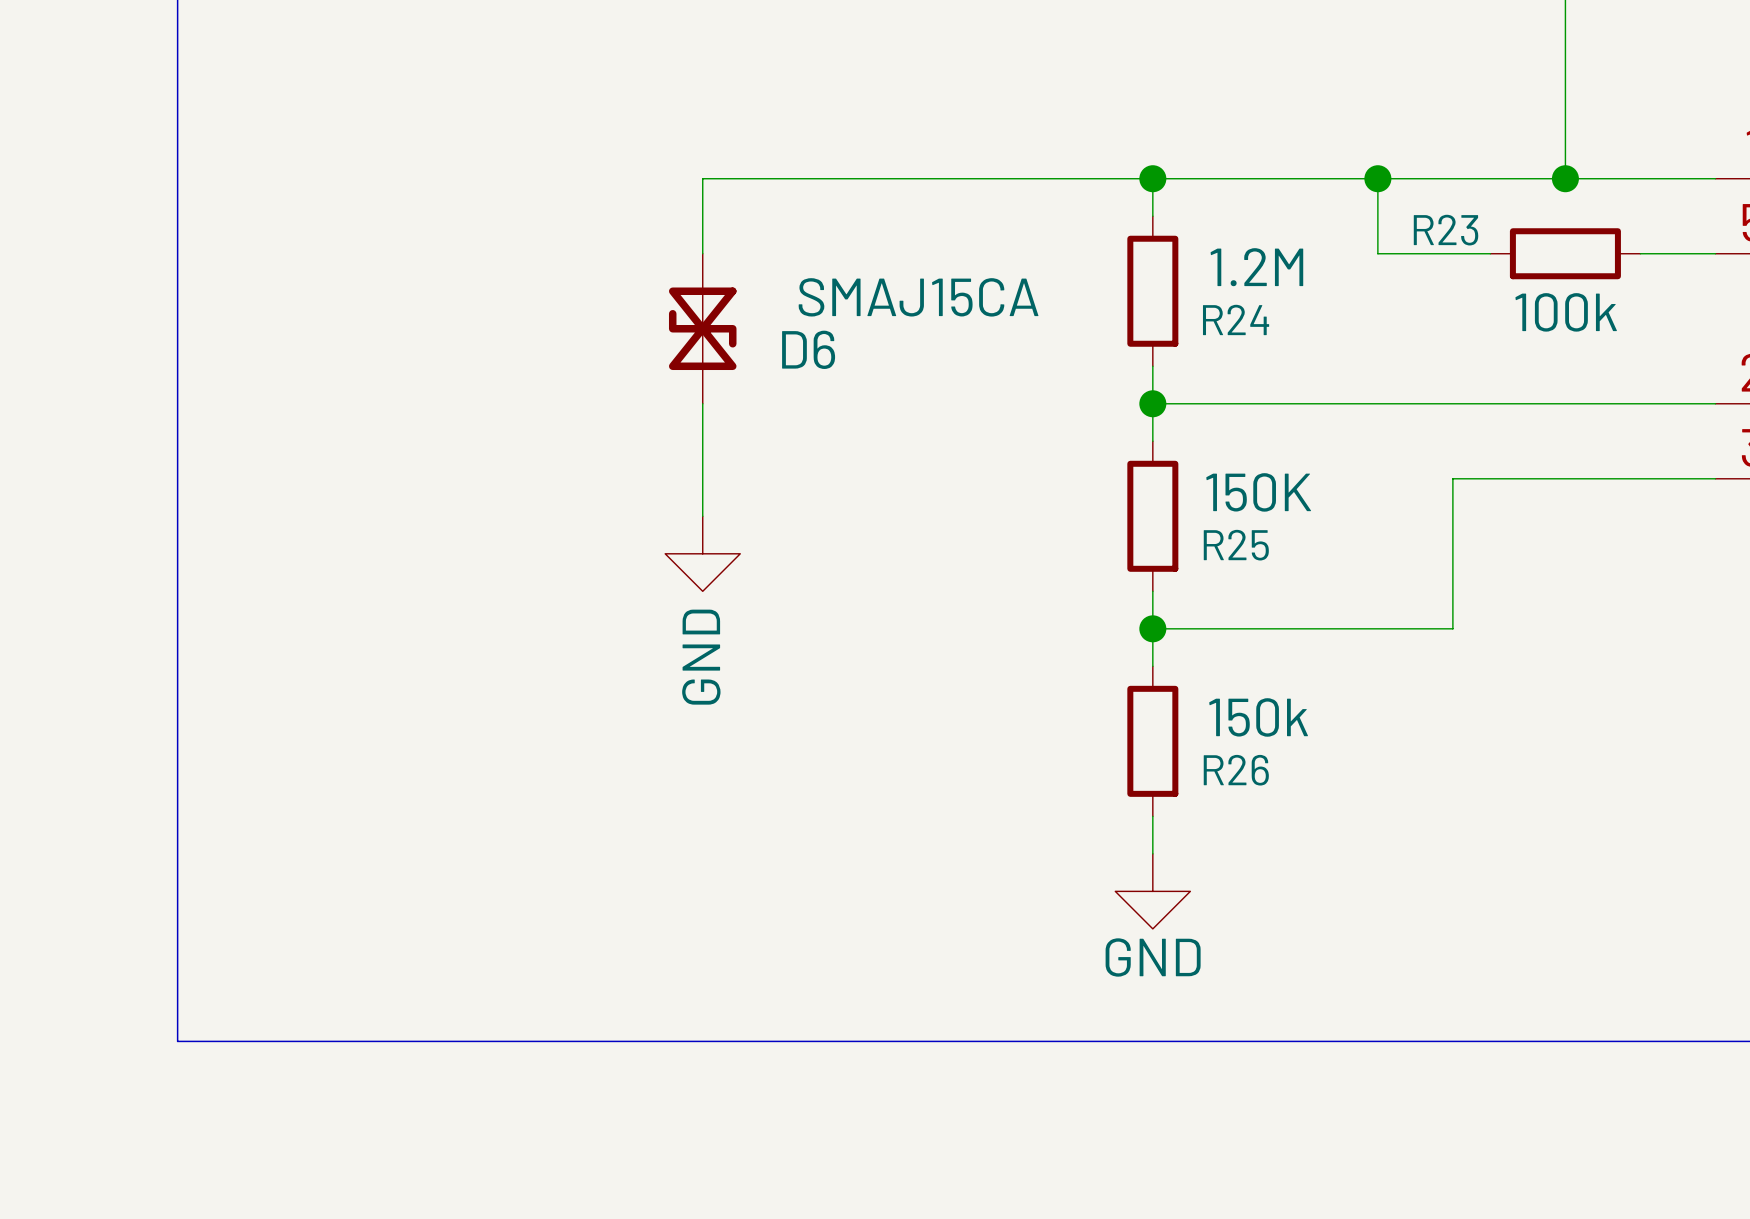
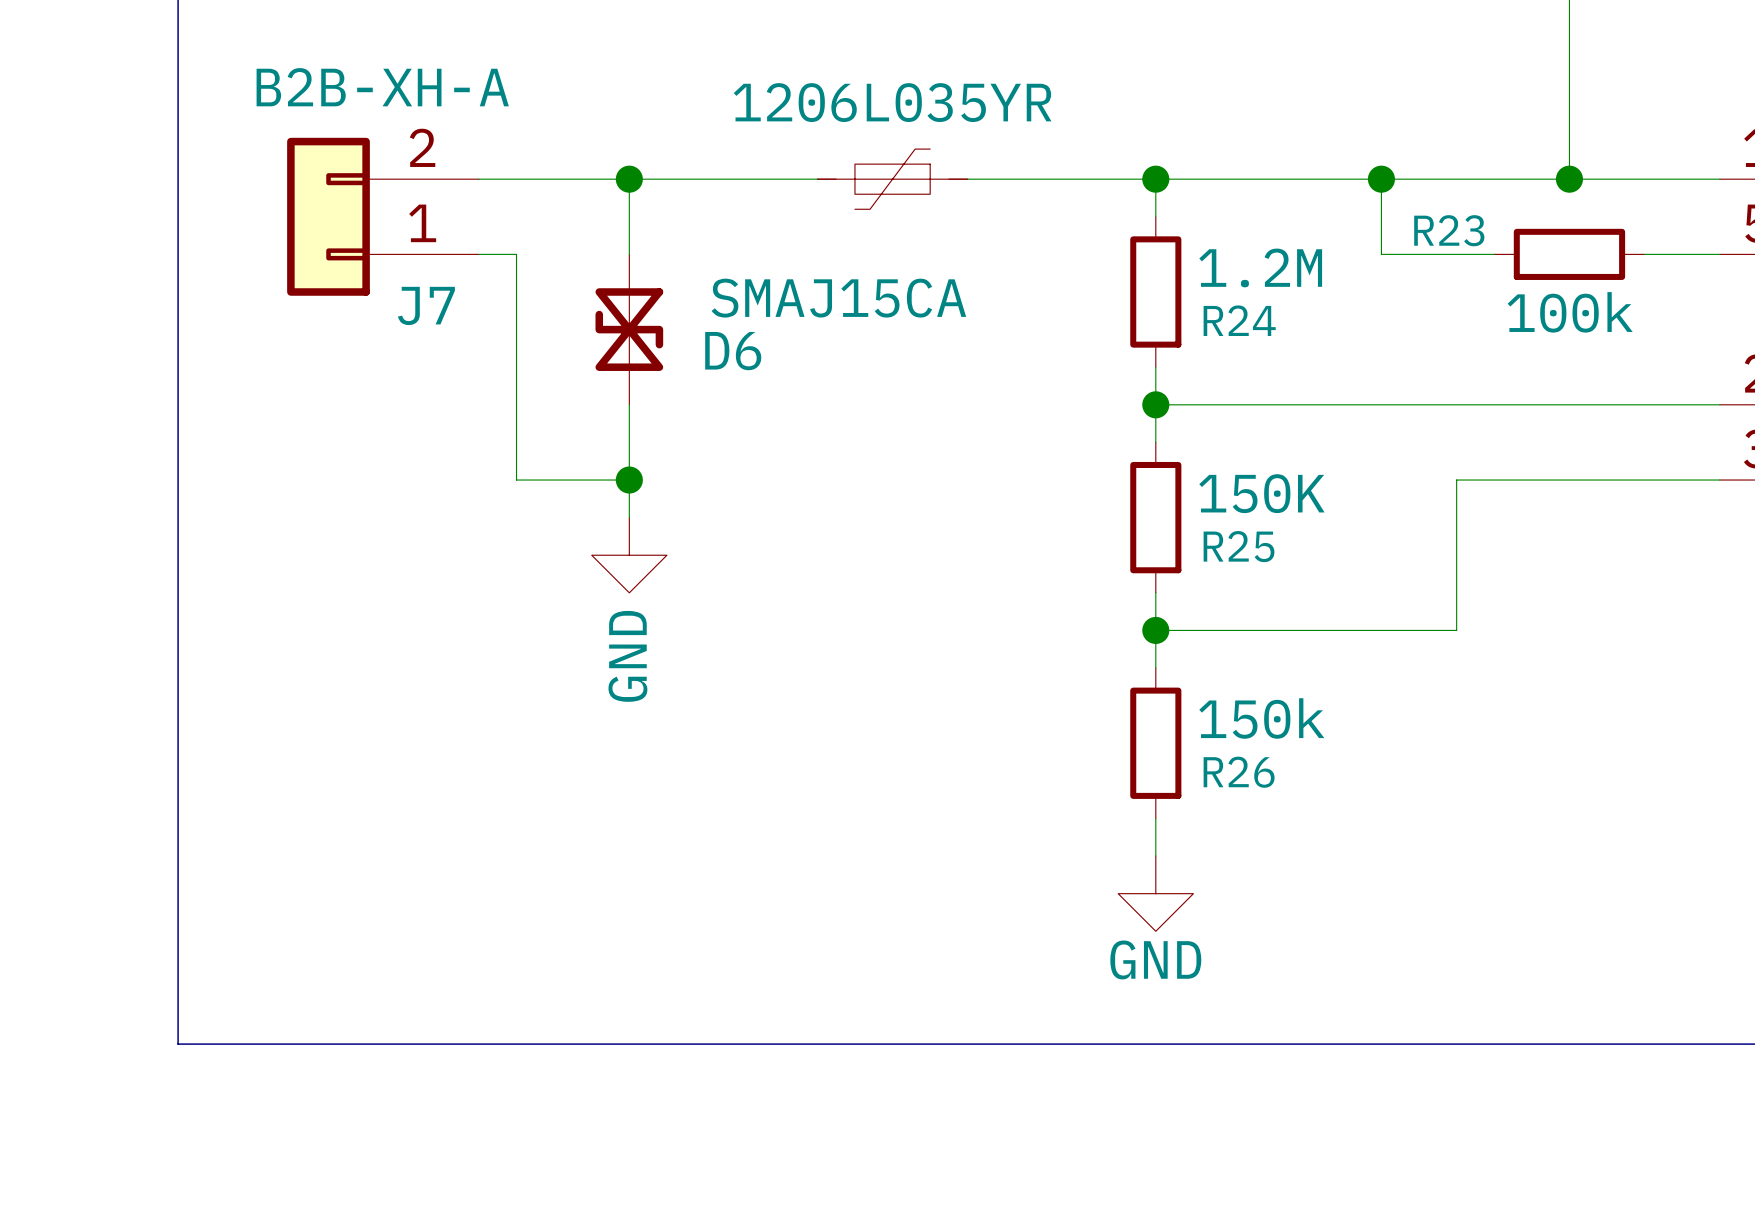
wire: none -> (629, 179) (629, 254)
junction: none -> (629, 179)
wire: (702, 178) (702, 253) -> (704, 179) (478, 179)
part: none -> 1206L035YR (892, 179)
J7: none -> B2B-XH-A (383, 216)
wire: none -> (478, 254) (516, 254) (516, 480) (629, 480)
D6 position: (702, 328) -> (629, 329)
wire: (702, 403) (702, 516) -> (629, 404) (629, 517)
junction: none -> (629, 480)
power symbol position: GND (702, 553) -> GND (629, 555)

